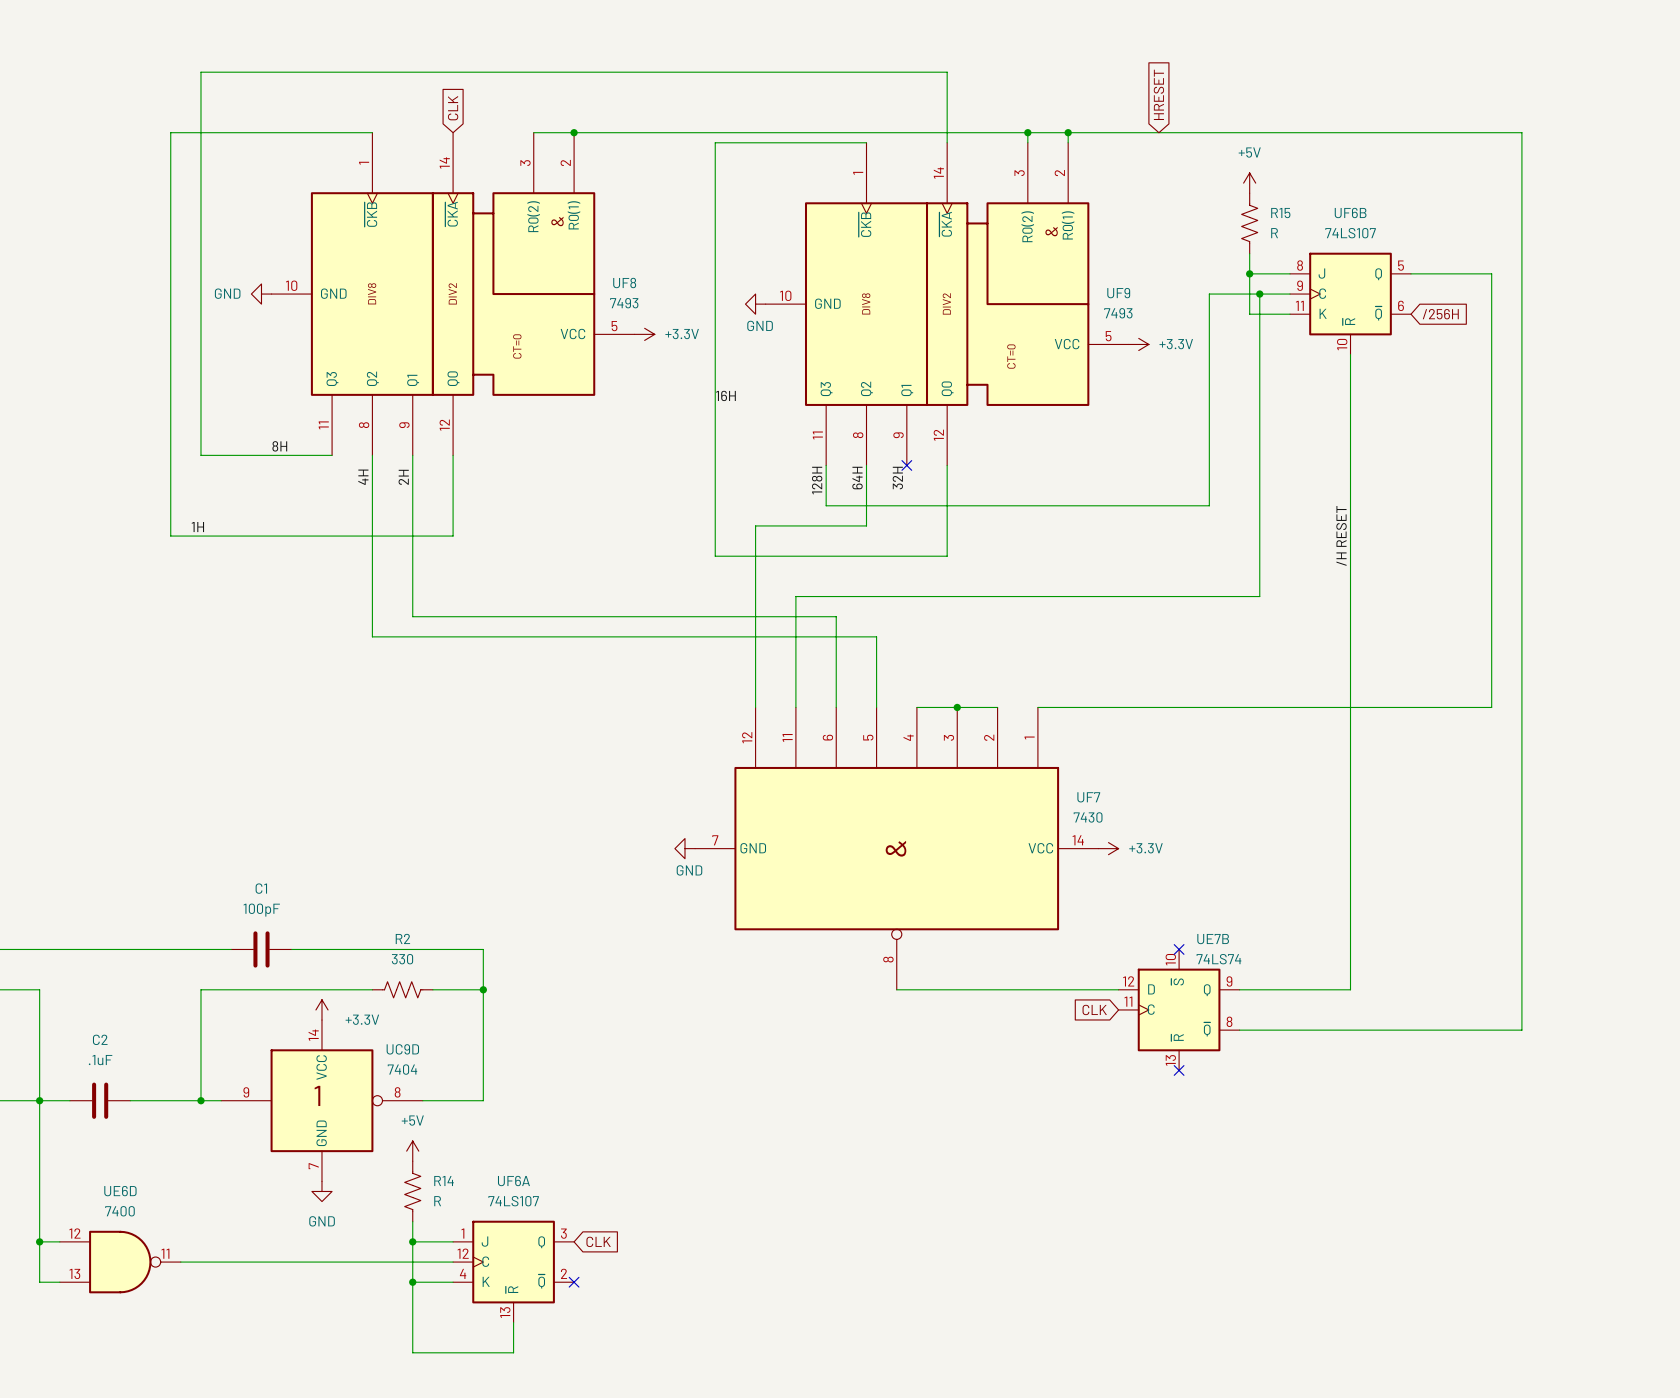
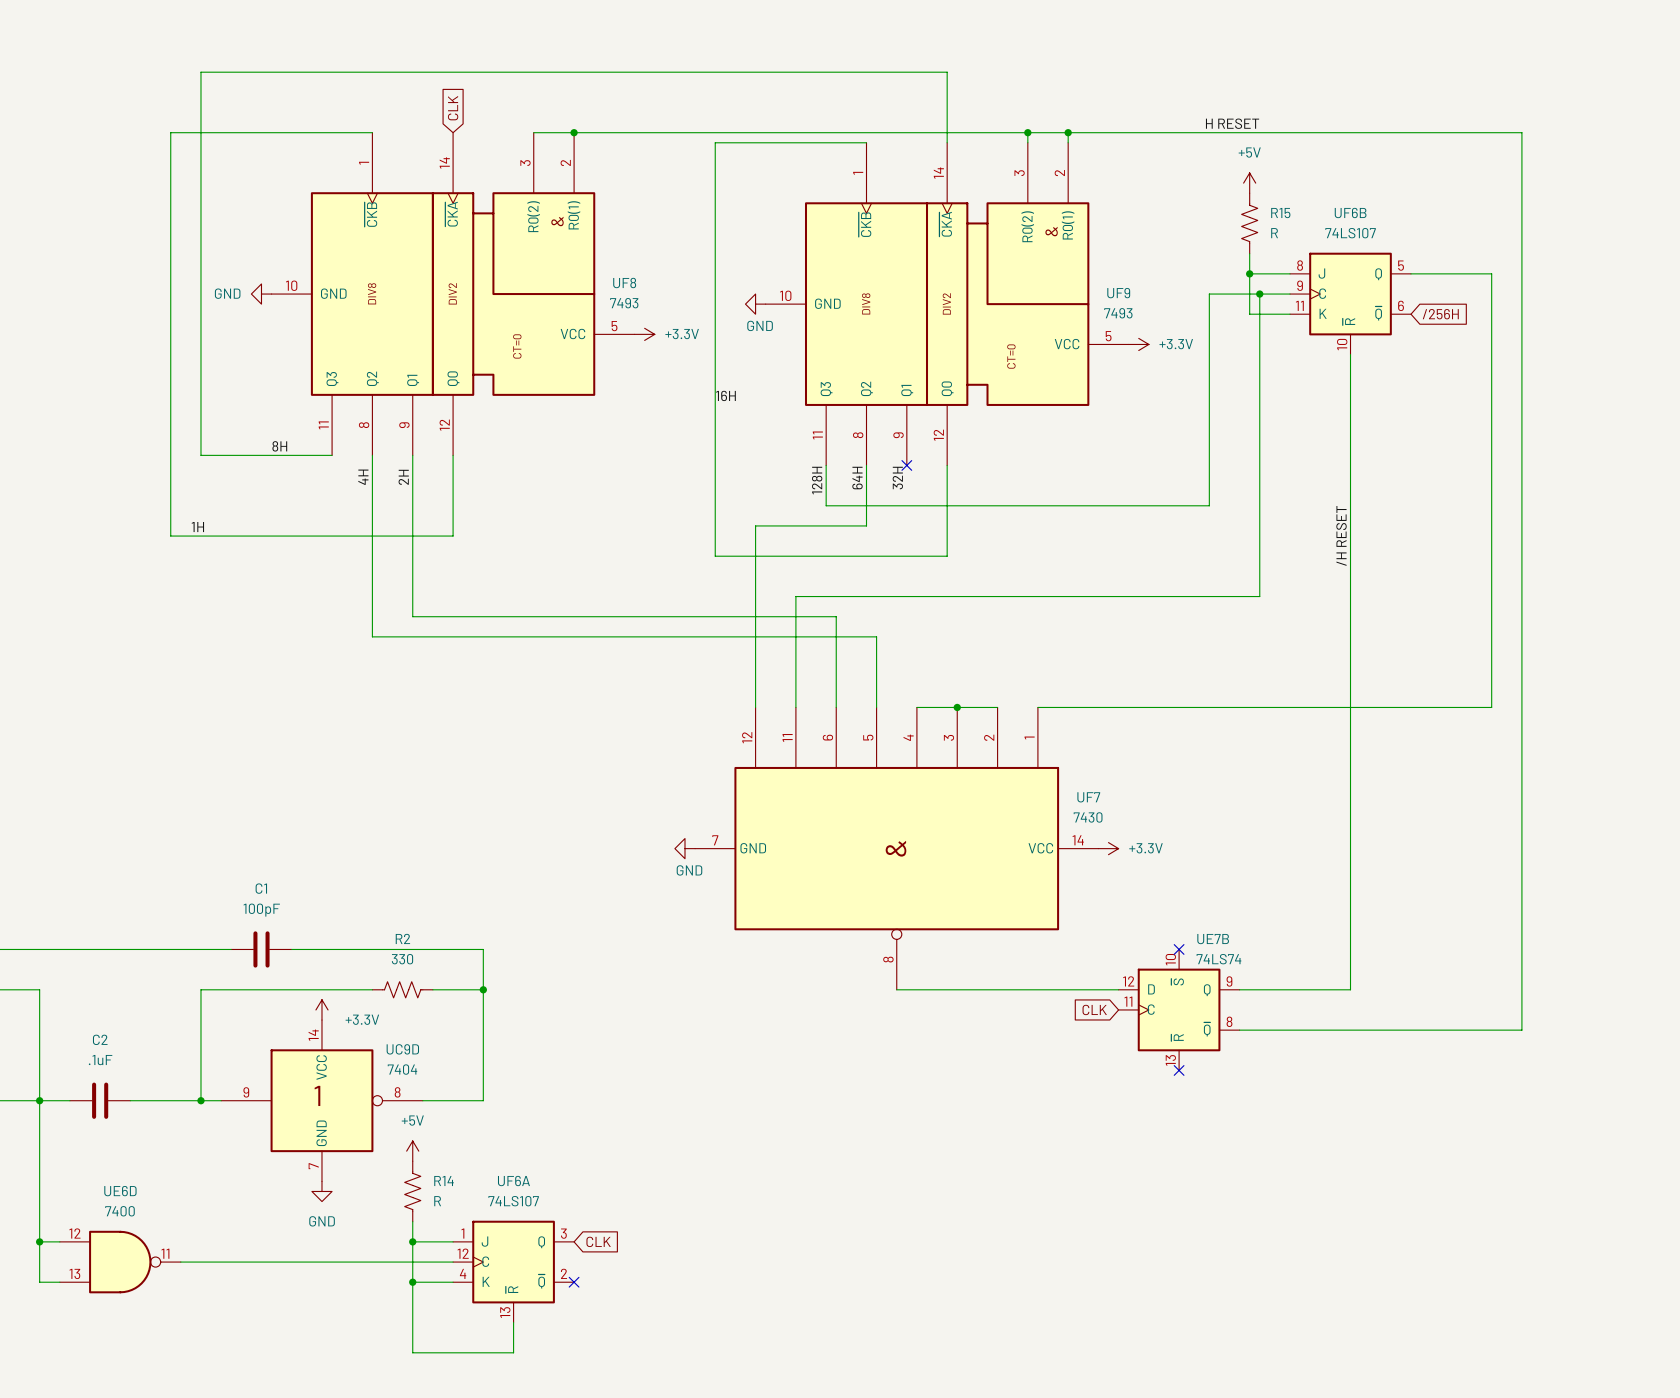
global label: HRESET (1158, 94) -> none
label: none -> H RESET (1232, 123)

